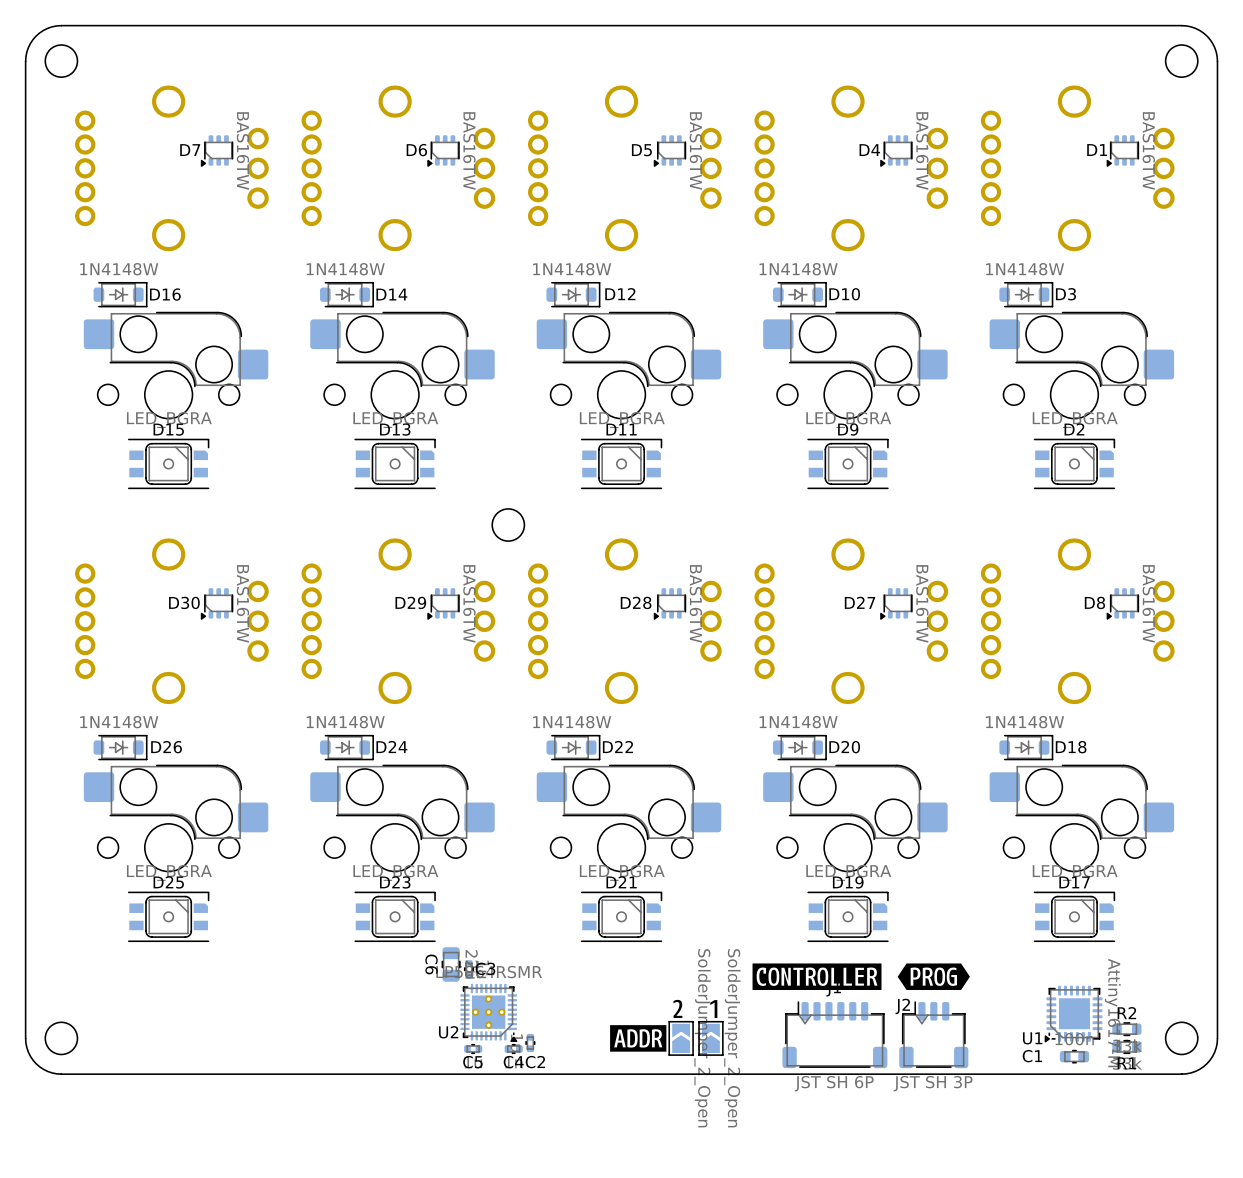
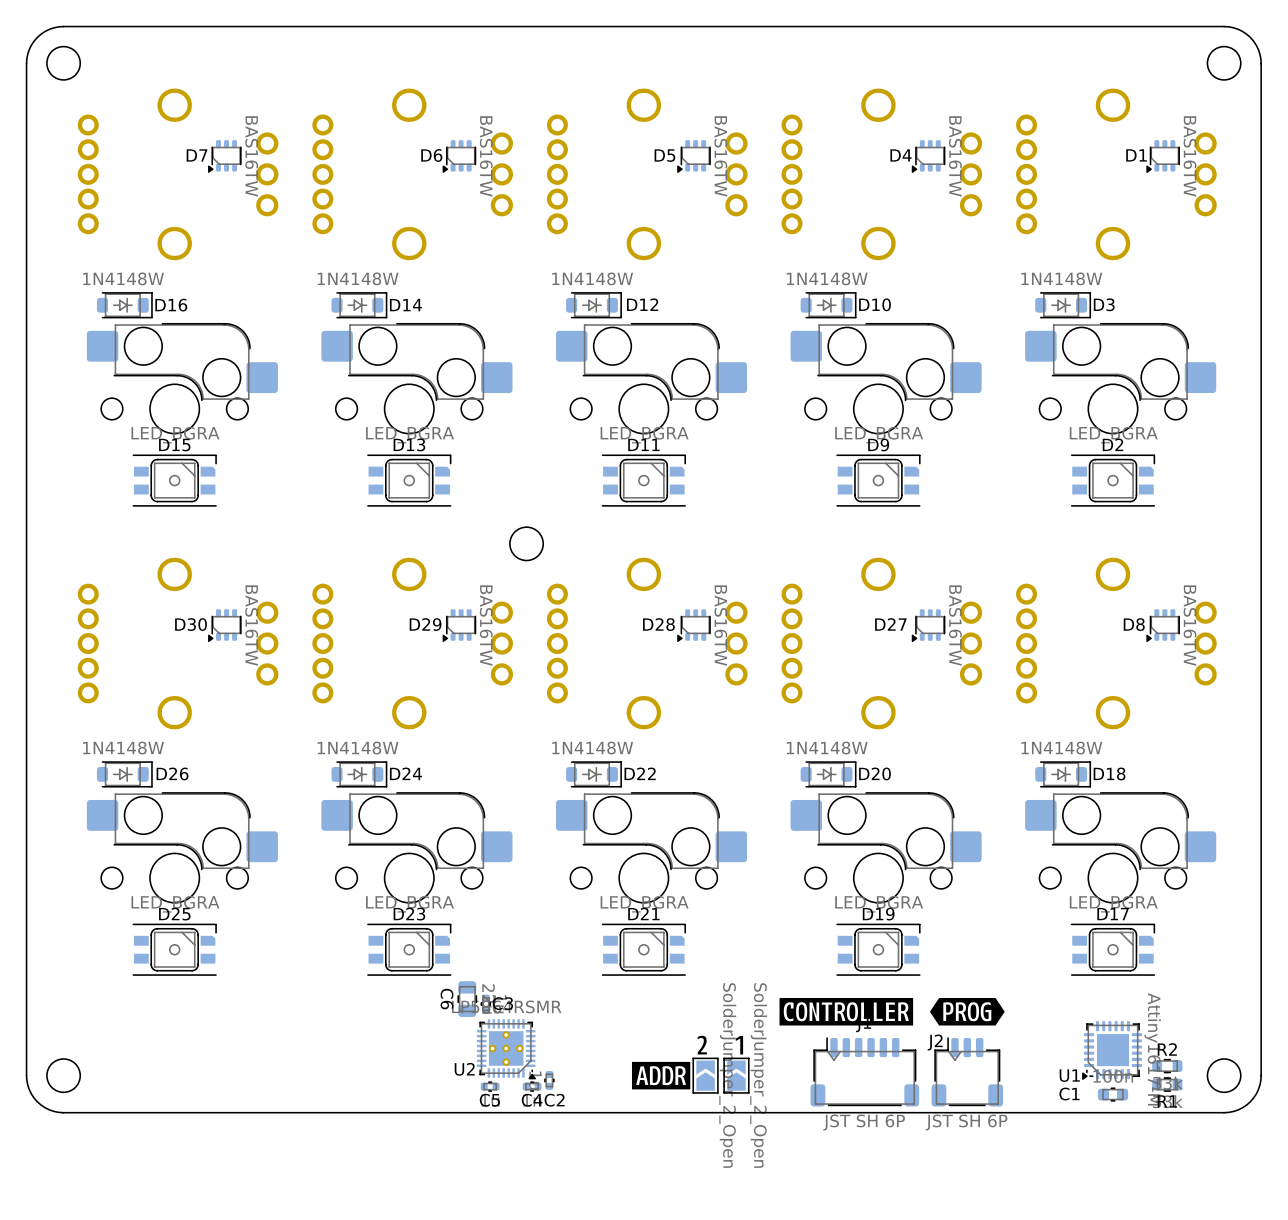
J2 value: JST SH 3P (933, 1083) -> JST SH 6P (966, 1122)

